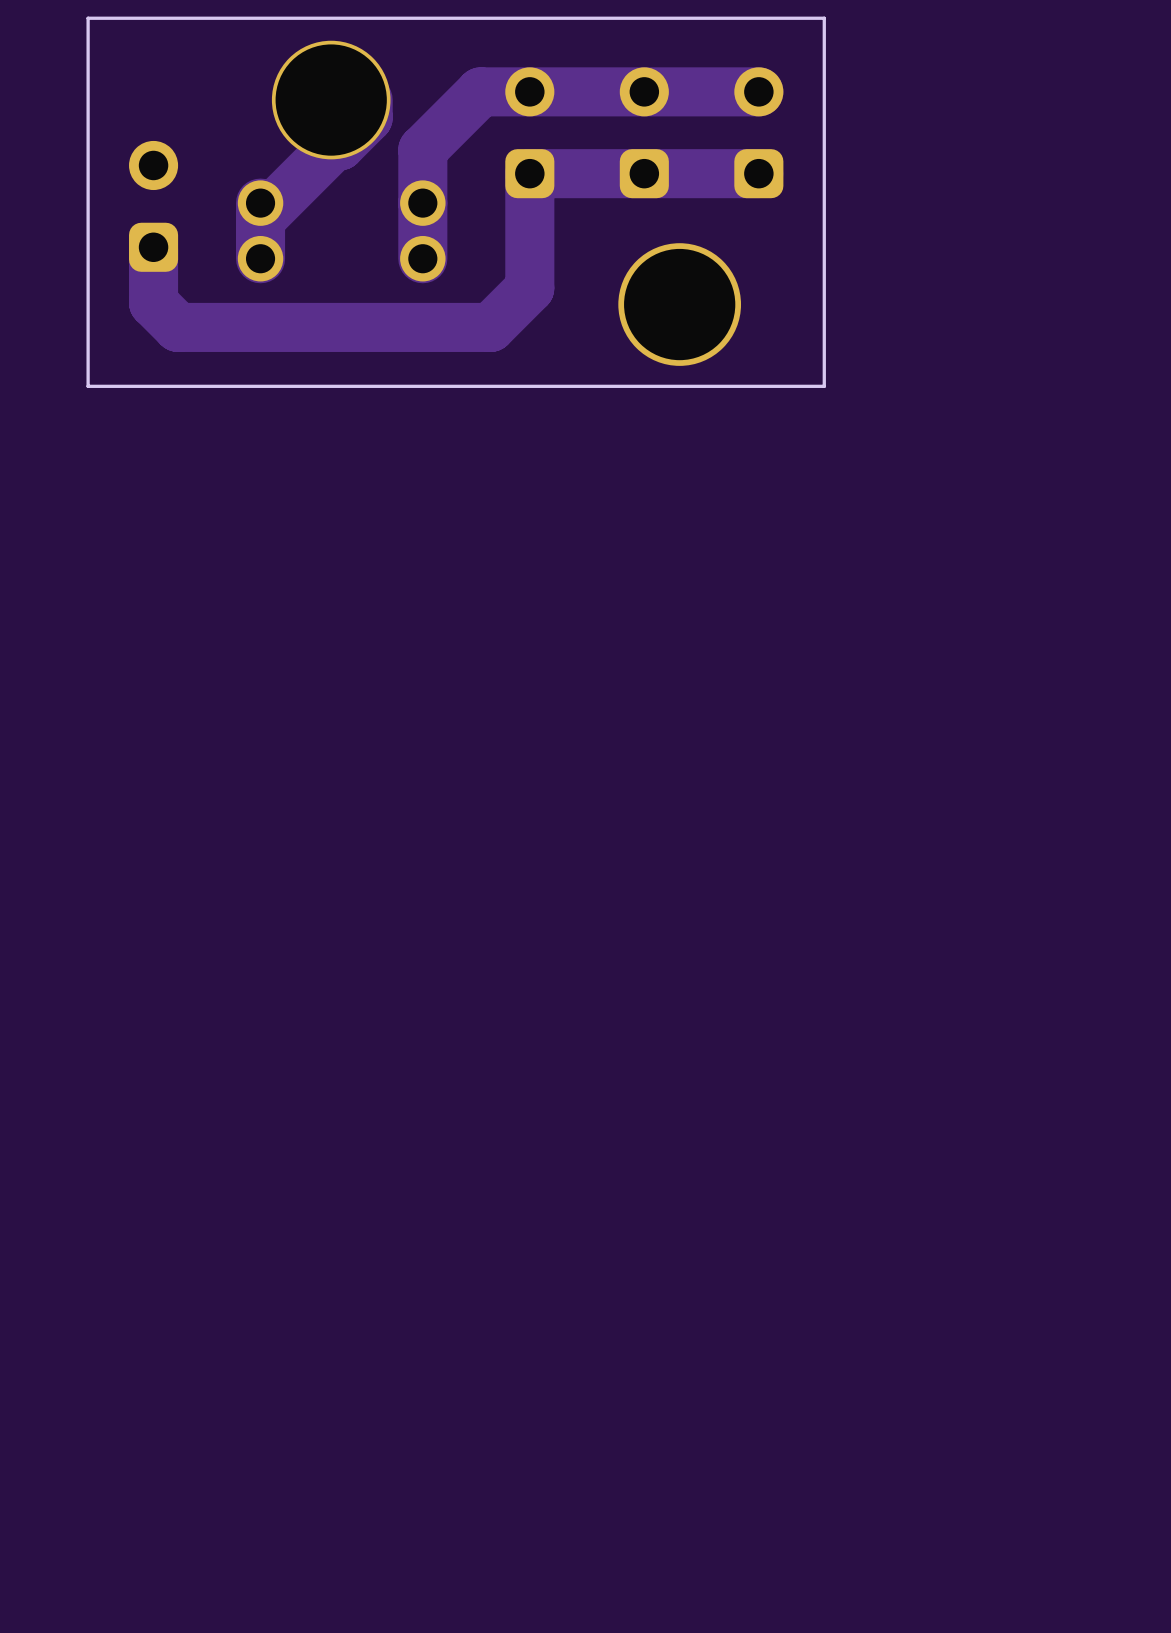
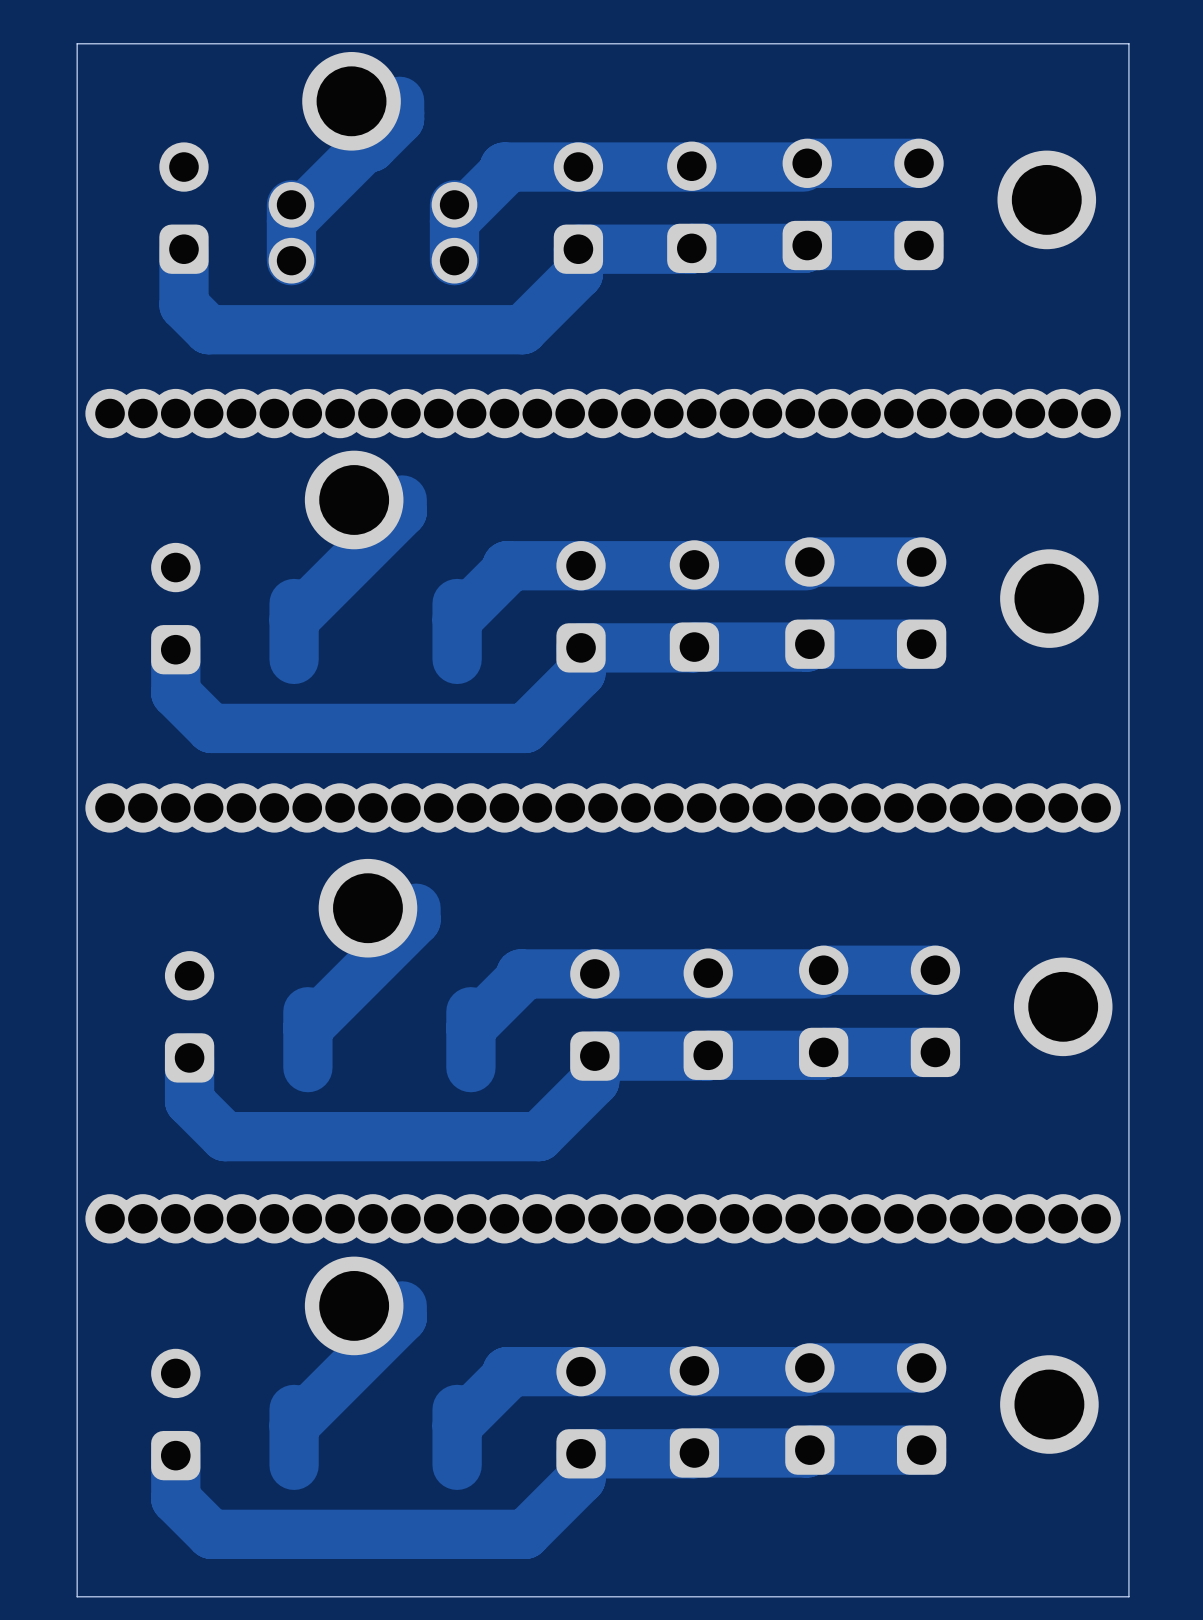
board edge: (824, 18) (88, 18) (88, 386) (824, 386) (824, 18) -> none
part footprint: [271, 40, 391, 160] -> [302, 51, 401, 151]
board edge: none -> (1128, 43) (77, 43) (77, 1596) (1128, 1596) (1128, 43)
track: (758, 91) (480, 91) (422, 149) (422, 203) -> none
part: (529, 132) -> none
part: (644, 132) -> none
part: (758, 132) -> none
track: none -> (919, 163) (807, 163) (803, 167) (504, 167) (504, 171) (454, 221)
track: (758, 173) (529, 173) (529, 288) -> (919, 245) (807, 245) (804, 248) (578, 249) (578, 273) (561, 290)
part: none -> (1046, 199)
part: none -> (807, 204)
part: none -> (919, 204)
part: none -> (691, 207)
part: none -> (578, 208)
part: (679, 304) -> none
part: none -> (110, 413)
part: none -> (142, 413)
part: none -> (175, 413)
part: none -> (208, 413)
part: none -> (241, 413)
part: none -> (274, 413)
part: none -> (307, 413)
part: none -> (340, 413)
part: none -> (372, 413)
part: none -> (405, 413)
part: none -> (438, 413)
part: none -> (471, 413)
part: none -> (504, 413)
part: none -> (537, 413)
part: none -> (570, 413)
part: none -> (603, 413)
part: none -> (635, 413)
part: none -> (668, 413)
part: none -> (701, 413)
part: none -> (734, 413)
part: none -> (767, 413)
part: none -> (800, 413)
part: none -> (833, 413)
part: none -> (866, 413)
part: none -> (898, 413)
part: none -> (931, 413)
part: none -> (964, 413)
part: none -> (997, 413)
part: none -> (1030, 413)
part: none -> (1063, 413)
part: none -> (1096, 413)
part: none -> (354, 499)
track: none -> (402, 499) (402, 511) (294, 619)
track: none -> (921, 562) (809, 562) (806, 565) (507, 565) (507, 569) (457, 619)
part: none -> (1049, 598)
track: none -> (294, 603) (294, 659)
track: none -> (457, 603) (457, 659)
part: none -> (809, 603)
part: none -> (921, 603)
part: none -> (694, 605)
part: none -> (581, 606)
part: none -> (175, 608)
track: none -> (921, 644) (809, 644) (807, 647) (581, 647) (581, 672) (525, 728) (211, 728) (175, 692) (175, 649)
part: none -> (110, 807)
part: none -> (142, 807)
part: none -> (175, 807)
part: none -> (208, 807)
part: none -> (241, 807)
part: none -> (274, 807)
part: none -> (307, 807)
part: none -> (340, 807)
part: none -> (372, 807)
part: none -> (405, 807)
part: none -> (438, 807)
part: none -> (471, 807)
part: none -> (504, 807)
part: none -> (537, 807)
part: none -> (570, 807)
part: none -> (603, 807)
part: none -> (635, 807)
part: none -> (668, 807)
part: none -> (701, 807)
part: none -> (734, 807)
part: none -> (767, 807)
part: none -> (800, 807)
part: none -> (833, 807)
part: none -> (866, 807)
part: none -> (898, 807)
part: none -> (931, 807)
part: none -> (964, 807)
part: none -> (997, 807)
part: none -> (1030, 807)
part: none -> (1063, 807)
part: none -> (1096, 807)
part: none -> (367, 908)
track: none -> (416, 908) (416, 920) (307, 1028)
track: none -> (935, 970) (823, 970) (819, 973) (520, 973) (520, 978) (470, 1028)
part: none -> (1063, 1006)
part: none -> (823, 1011)
part: none -> (935, 1011)
track: none -> (307, 1011) (307, 1067)
track: none -> (470, 1011) (470, 1067)
part: none -> (708, 1014)
part: none -> (594, 1015)
part: none -> (189, 1016)
track: none -> (935, 1052) (823, 1052) (820, 1055) (594, 1056) (594, 1080) (538, 1136) (225, 1136) (189, 1101) (189, 1057)
part: none -> (110, 1218)
part: none -> (142, 1218)
part: none -> (175, 1218)
part: none -> (208, 1218)
part: none -> (241, 1218)
part: none -> (274, 1218)
part: none -> (307, 1218)
part: none -> (340, 1218)
part: none -> (372, 1218)
part: none -> (405, 1218)
part: none -> (438, 1218)
part: none -> (471, 1218)
part: none -> (504, 1218)
part: none -> (537, 1218)
part: none -> (570, 1218)
part: none -> (603, 1218)
part: none -> (635, 1218)
part: none -> (668, 1218)
part: none -> (701, 1218)
part: none -> (734, 1218)
part: none -> (767, 1218)
part: none -> (800, 1218)
part: none -> (833, 1218)
part: none -> (866, 1218)
part: none -> (898, 1218)
part: none -> (931, 1218)
part: none -> (964, 1218)
part: none -> (997, 1218)
part: none -> (1030, 1218)
part: none -> (1063, 1218)
part: none -> (1096, 1218)
part: none -> (354, 1305)
track: none -> (402, 1305) (402, 1317) (294, 1425)
track: none -> (921, 1367) (809, 1367) (806, 1371) (507, 1371) (507, 1375) (457, 1425)
part: none -> (1049, 1404)
part: none -> (809, 1409)
part: none -> (921, 1409)
track: none -> (294, 1409) (294, 1465)
track: none -> (457, 1409) (457, 1465)
part: none -> (694, 1411)
part: none -> (581, 1412)
part: none -> (175, 1414)
track: none -> (921, 1450) (809, 1450) (807, 1452) (581, 1453) (581, 1478) (525, 1534) (211, 1534) (175, 1498) (175, 1455)

